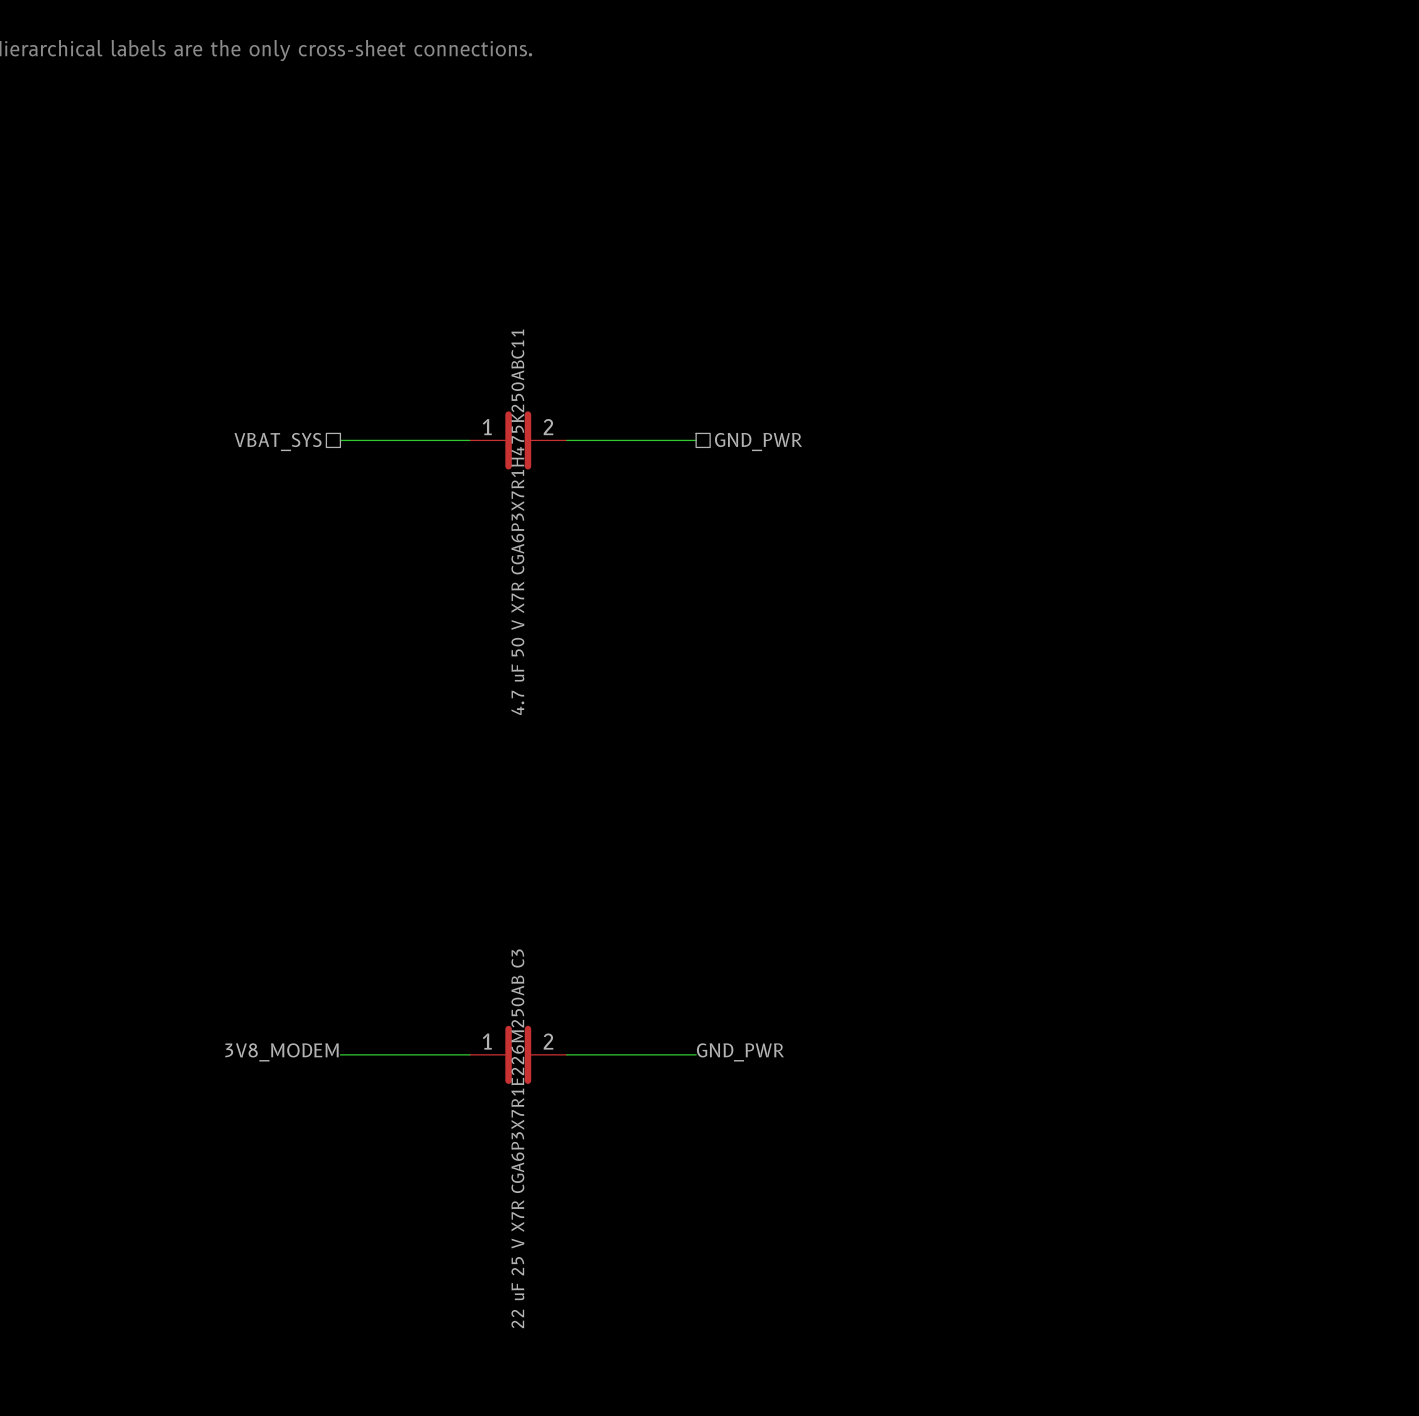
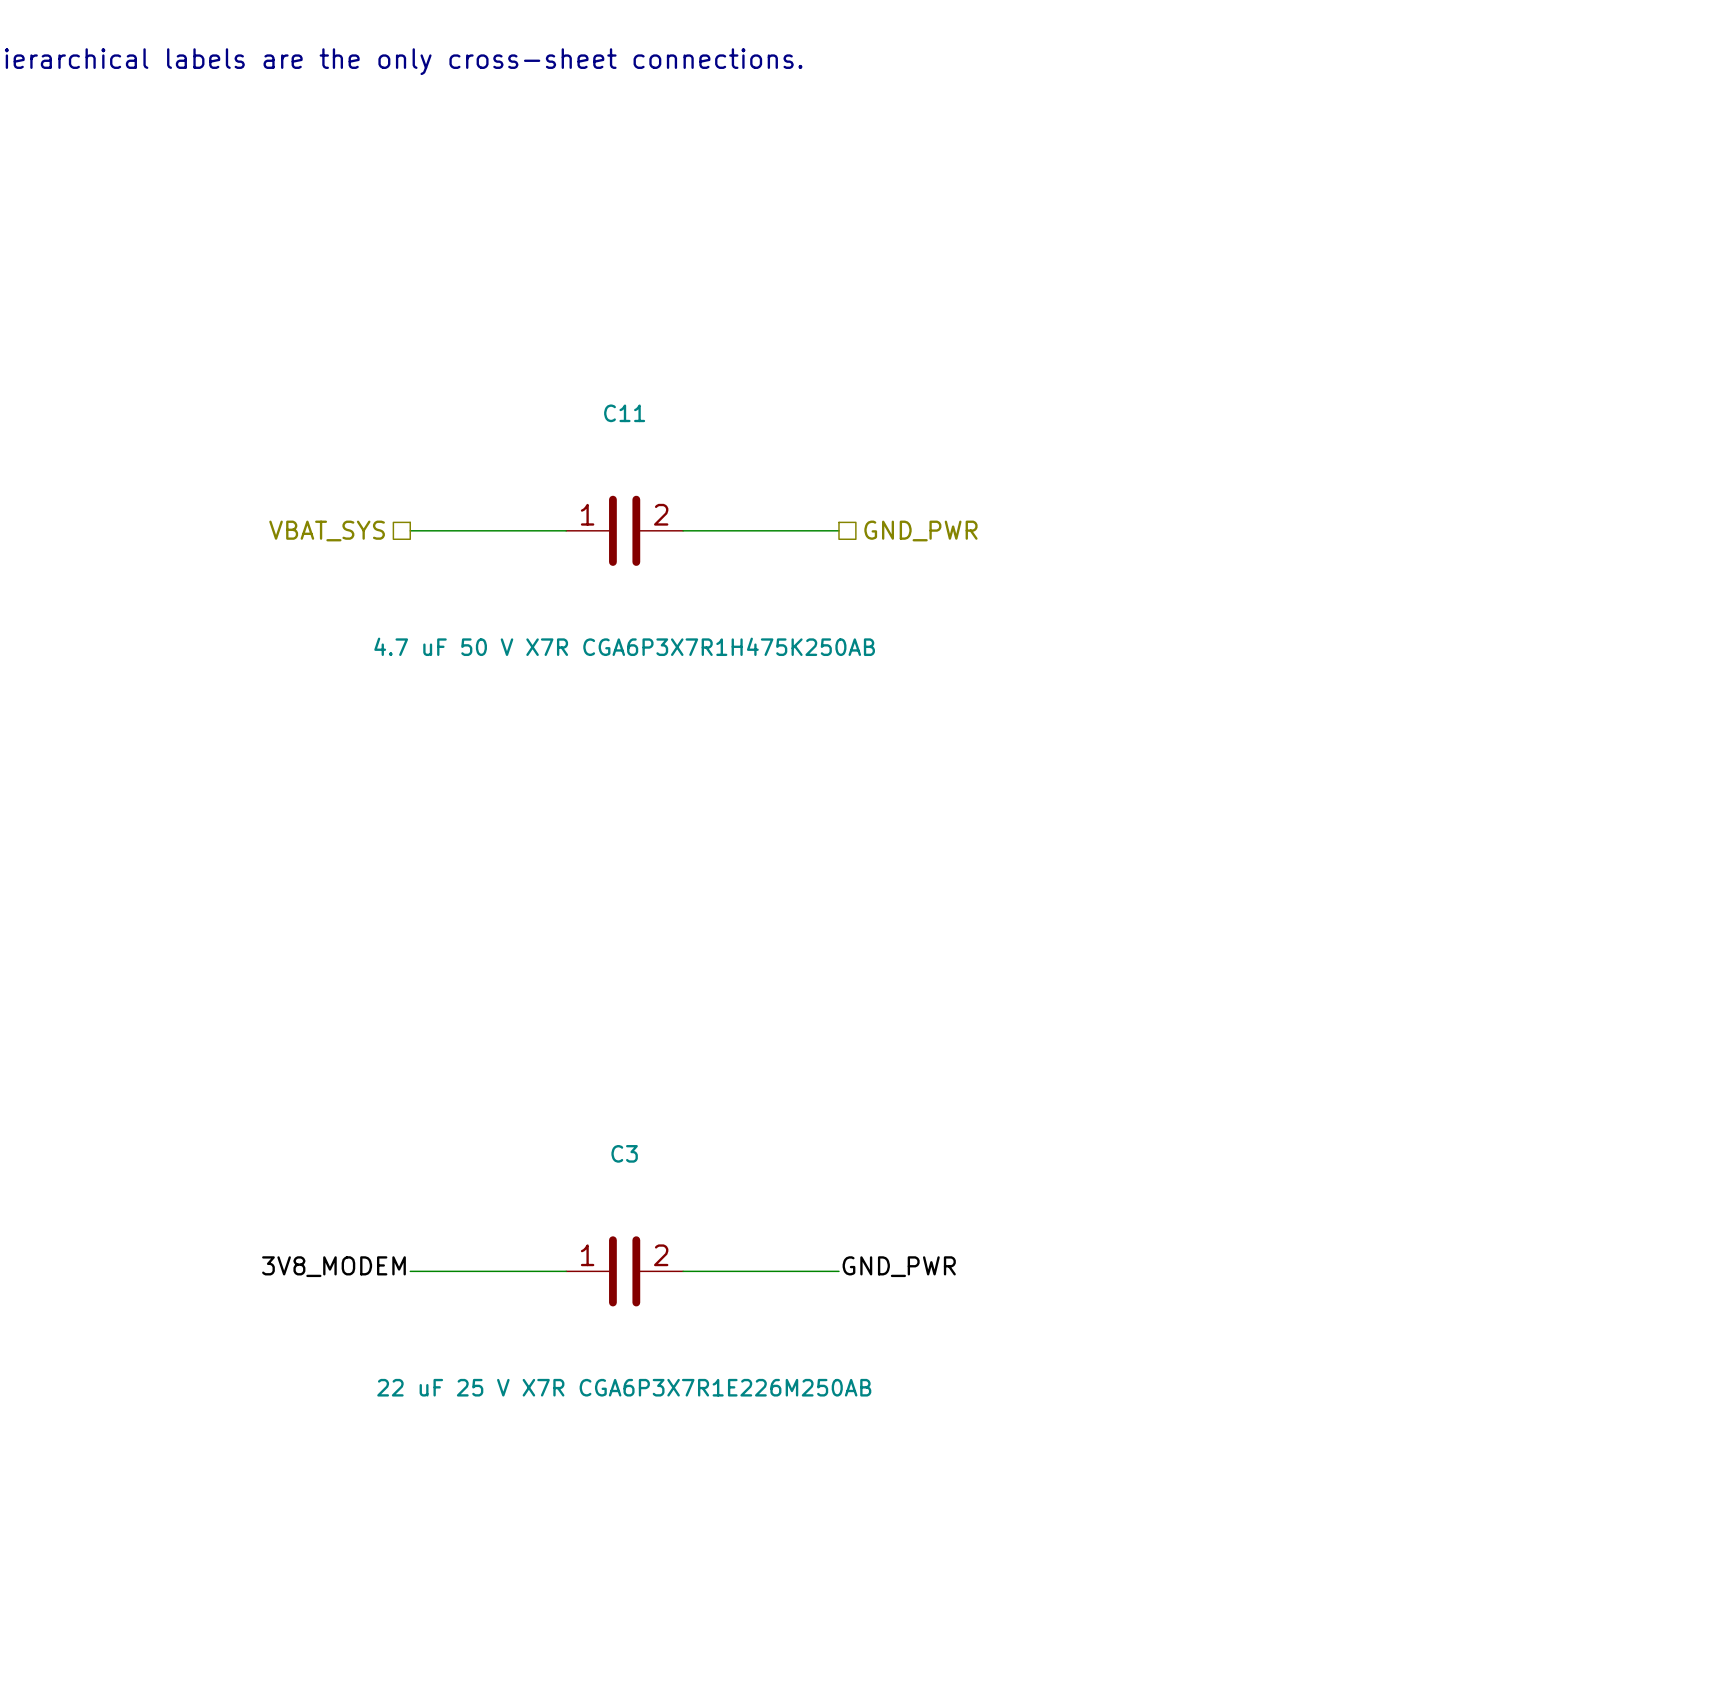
C11 name rotation: 0° (517, 344) -> 90° clockwise (624, 413)
C11 value rotation: 0° (517, 537) -> 90° clockwise (624, 646)
C3 name rotation: 0° (517, 958) -> 90° clockwise (624, 1153)
C3 value rotation: 0° (517, 1151) -> 90° clockwise (624, 1387)

